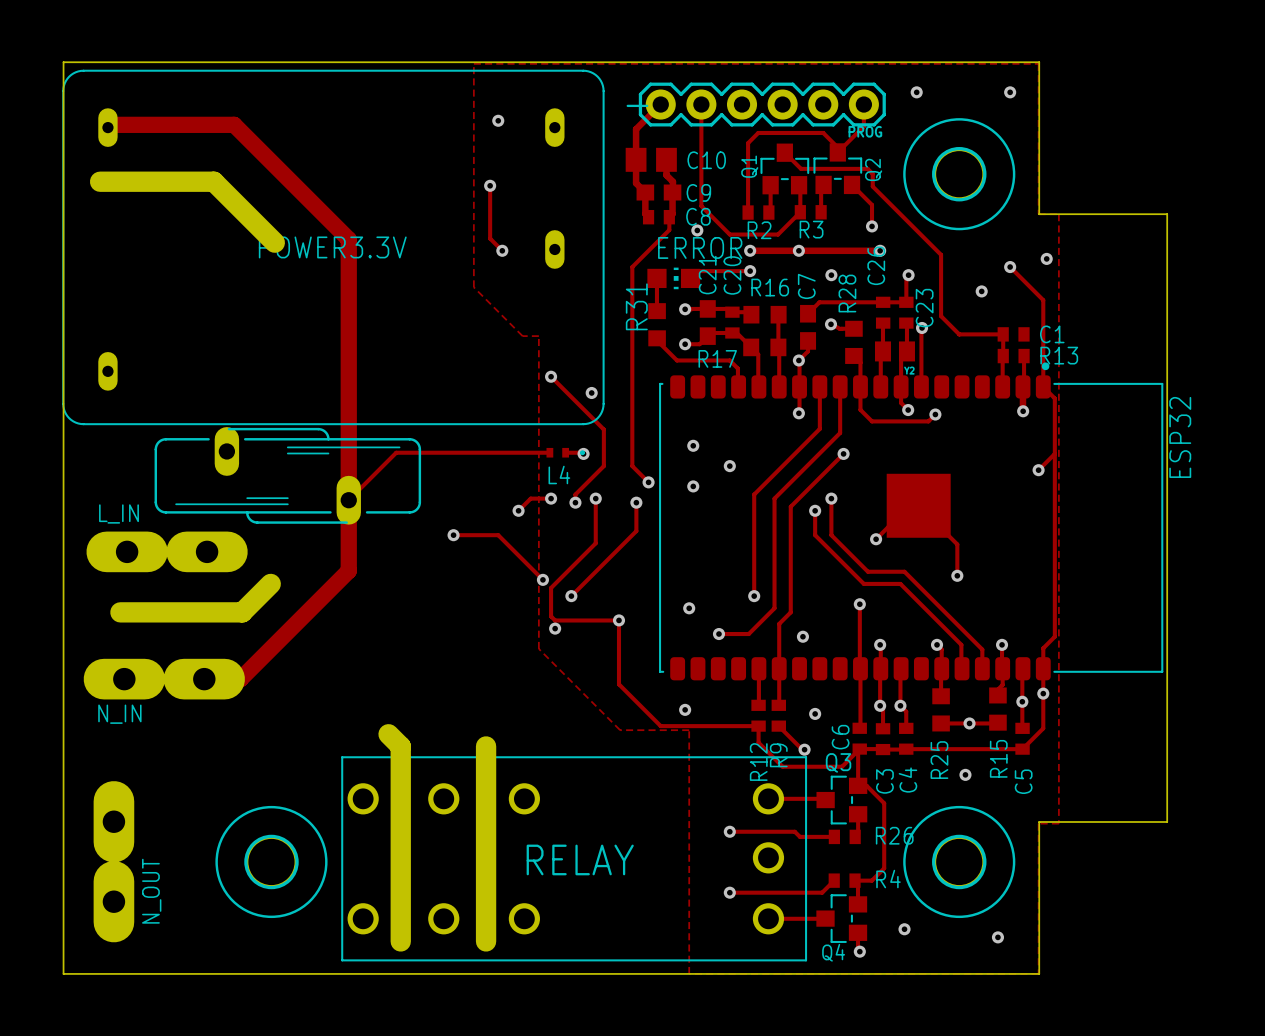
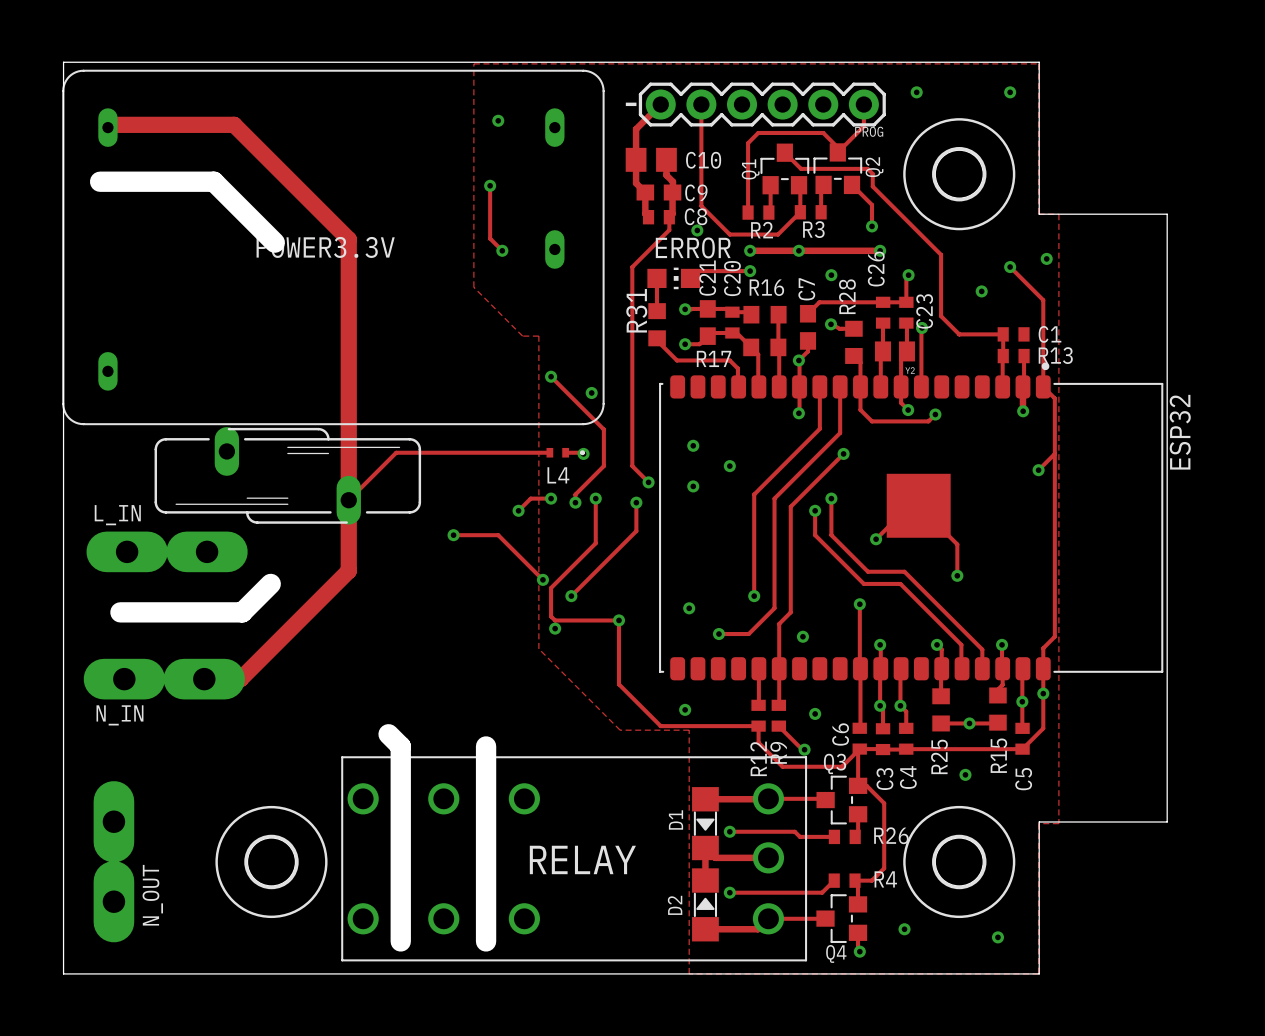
track: none -> (705, 799) (768, 799)
D1: none -> (705, 823)
track: none -> (768, 857) (715, 857) (705, 848) (705, 880)
D2: none -> (705, 904)
track: none -> (768, 918) (758, 929) (705, 929)

